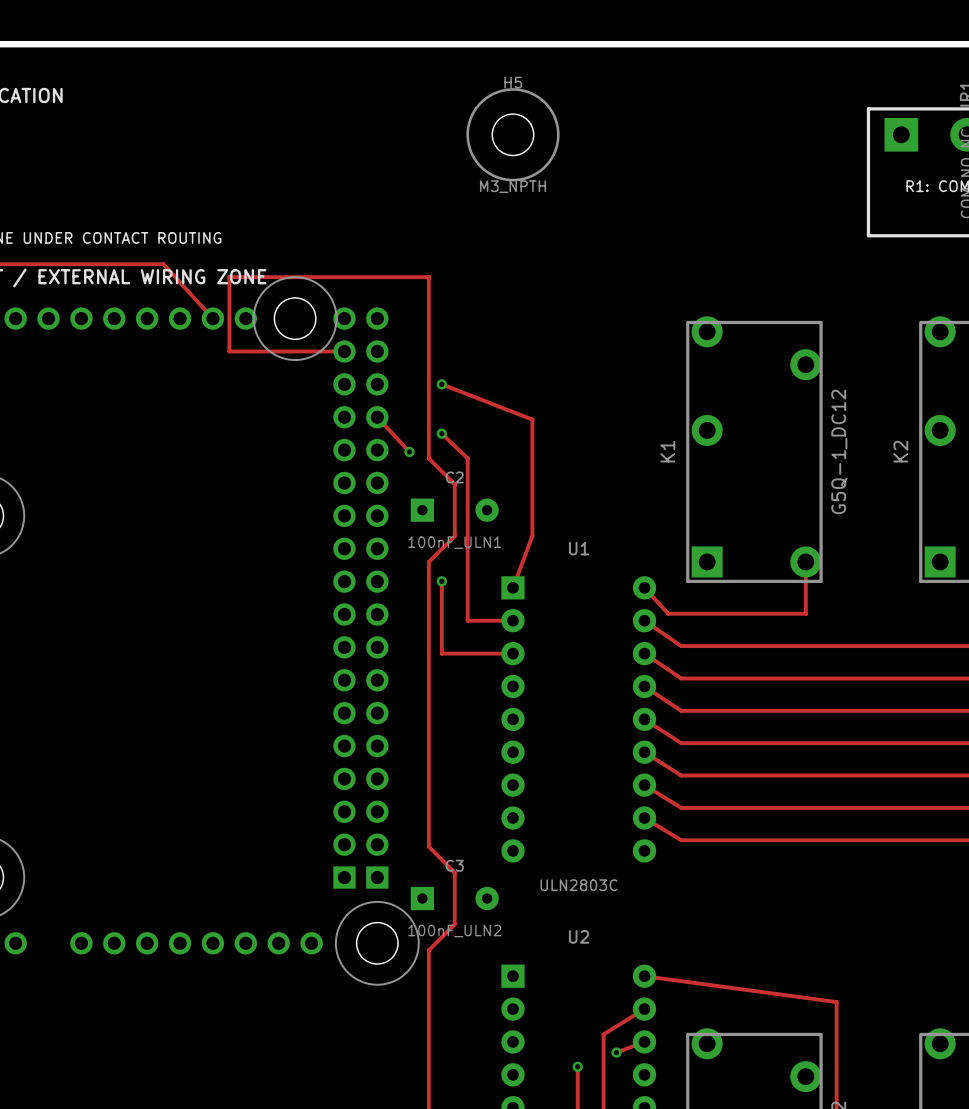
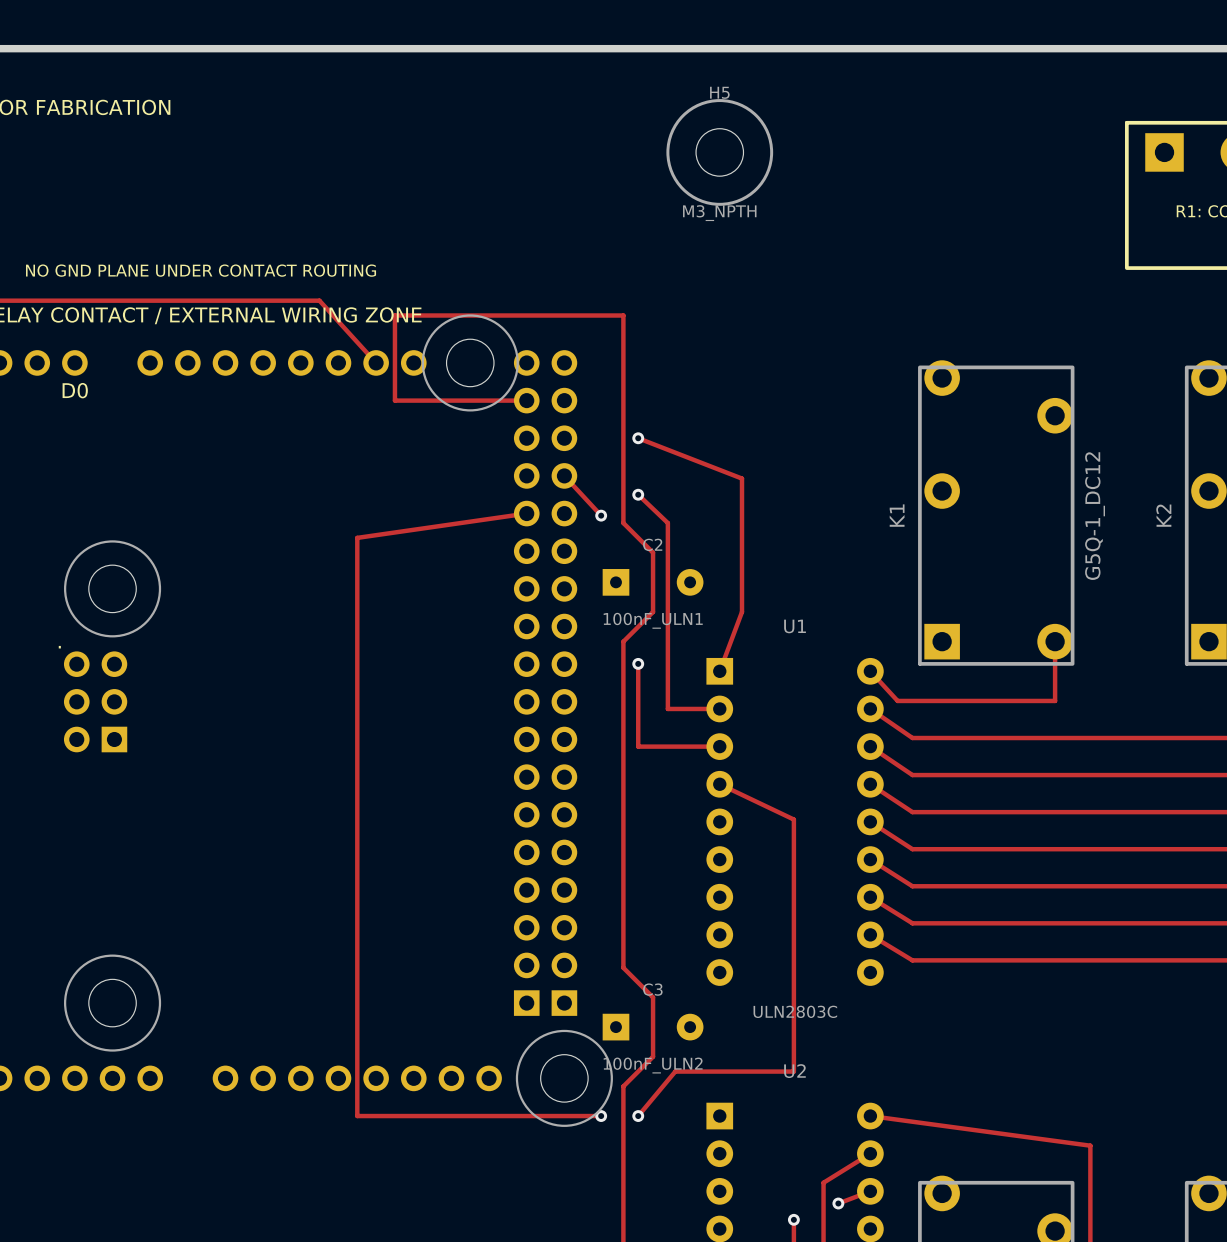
track: none -> (526, 513) (357, 537) (357, 1116) (601, 1116)
track: none -> (719, 784) (793, 819) (793, 1071) (675, 1071) (638, 1116)
via: none -> (601, 1116)
via: none -> (638, 1116)

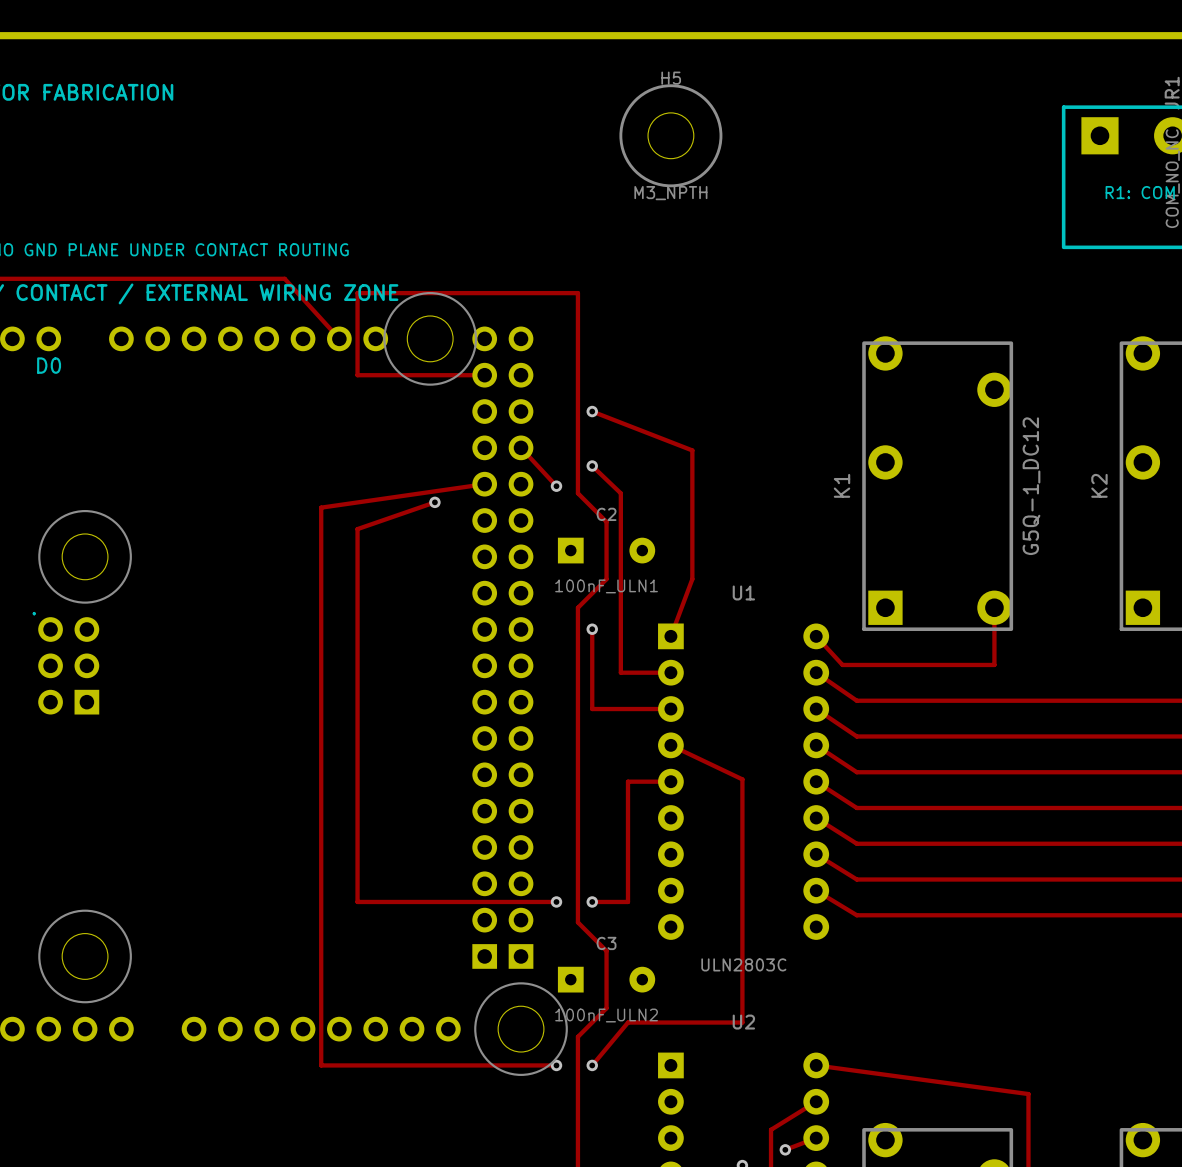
track: none -> (434, 502) (357, 529) (357, 901) (556, 901)
via: none -> (434, 502)
track: none -> (670, 781) (628, 781) (628, 901) (592, 901)
via: none -> (556, 901)
via: none -> (592, 901)

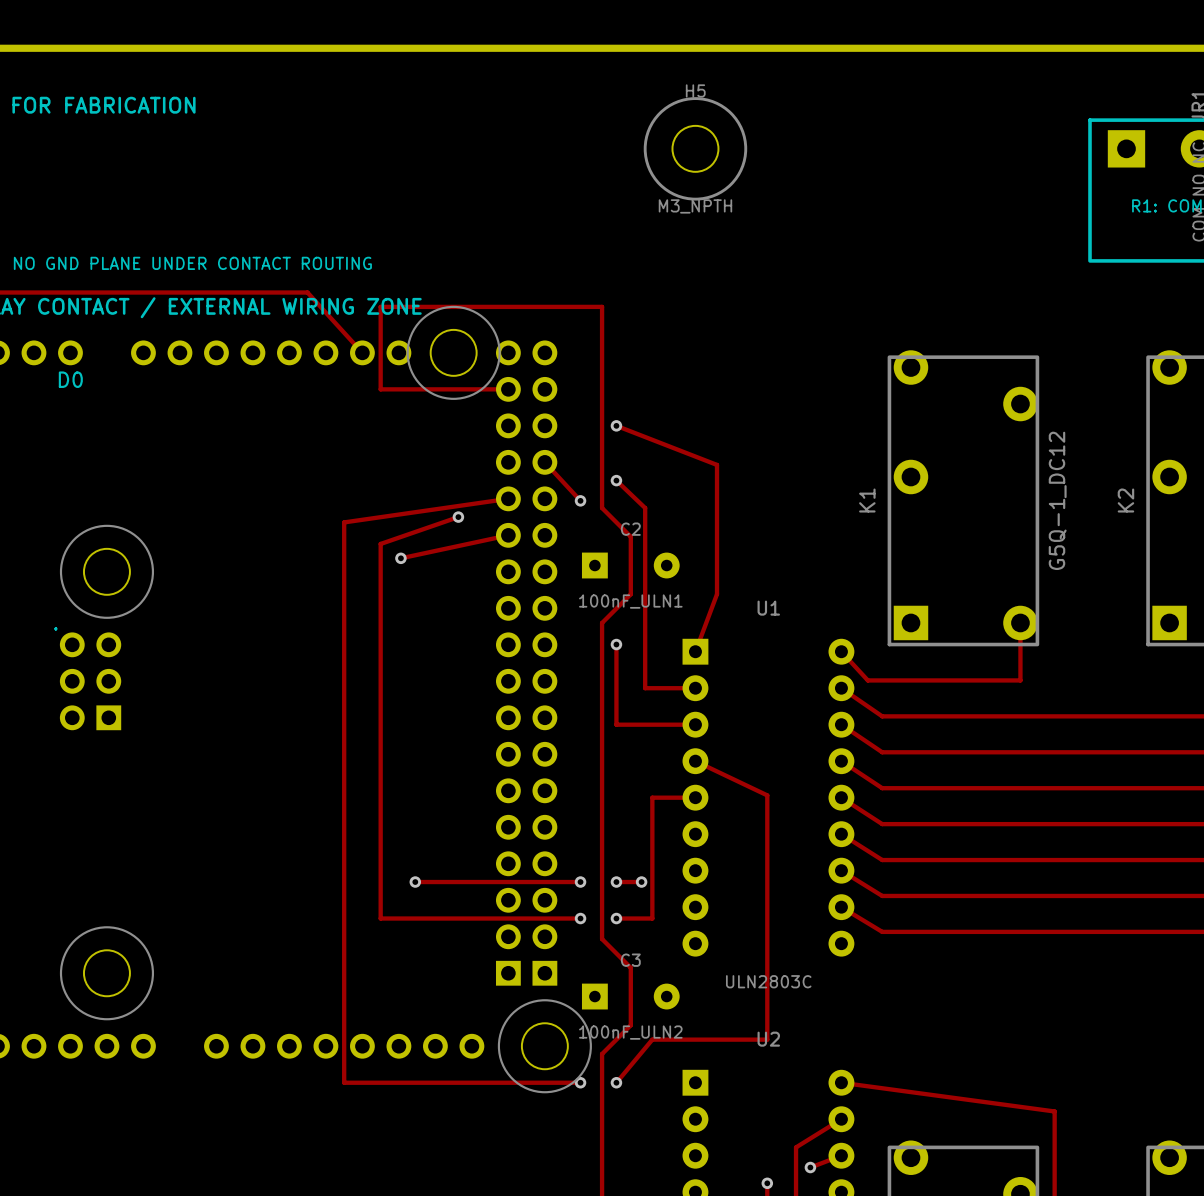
track: none -> (508, 535) (400, 558)
via: none -> (400, 558)
track: none -> (415, 882) (580, 882)
via: none -> (415, 882)
via: none -> (580, 882)
track: none -> (616, 882) (641, 882)
via: none -> (616, 882)
via: none -> (641, 882)

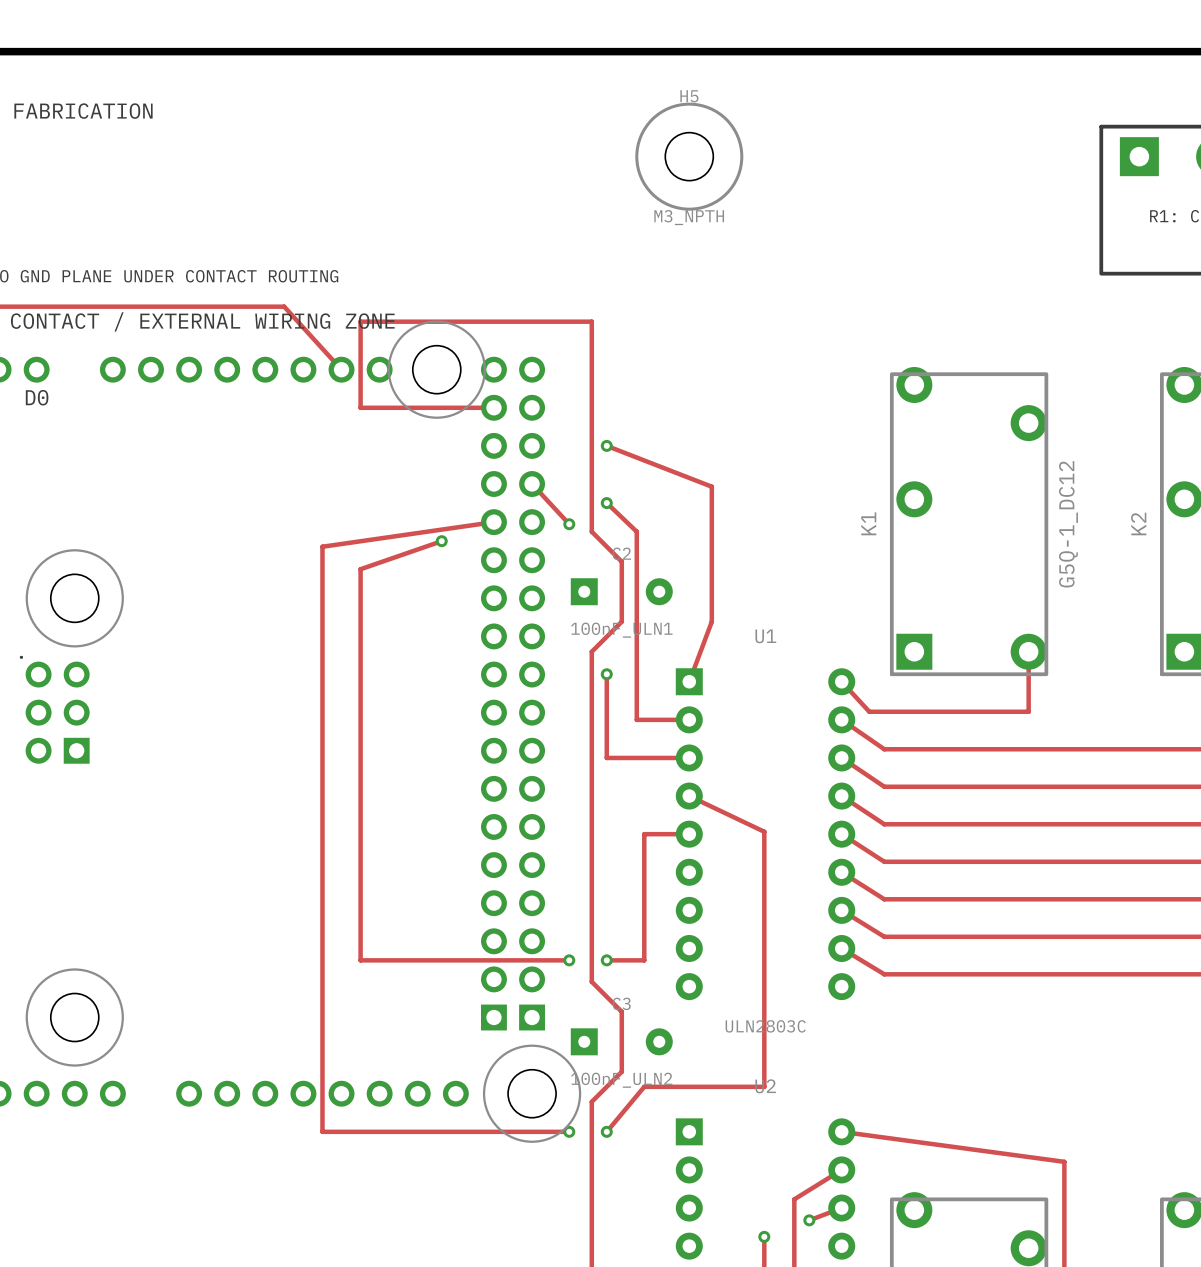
track: (508, 535) (400, 558) -> none
via: (400, 558) -> none
track: (415, 882) (580, 882) -> none
via: (415, 882) -> none
via: (580, 882) -> none
track: (616, 882) (641, 882) -> none
via: (616, 882) -> none
via: (641, 882) -> none

